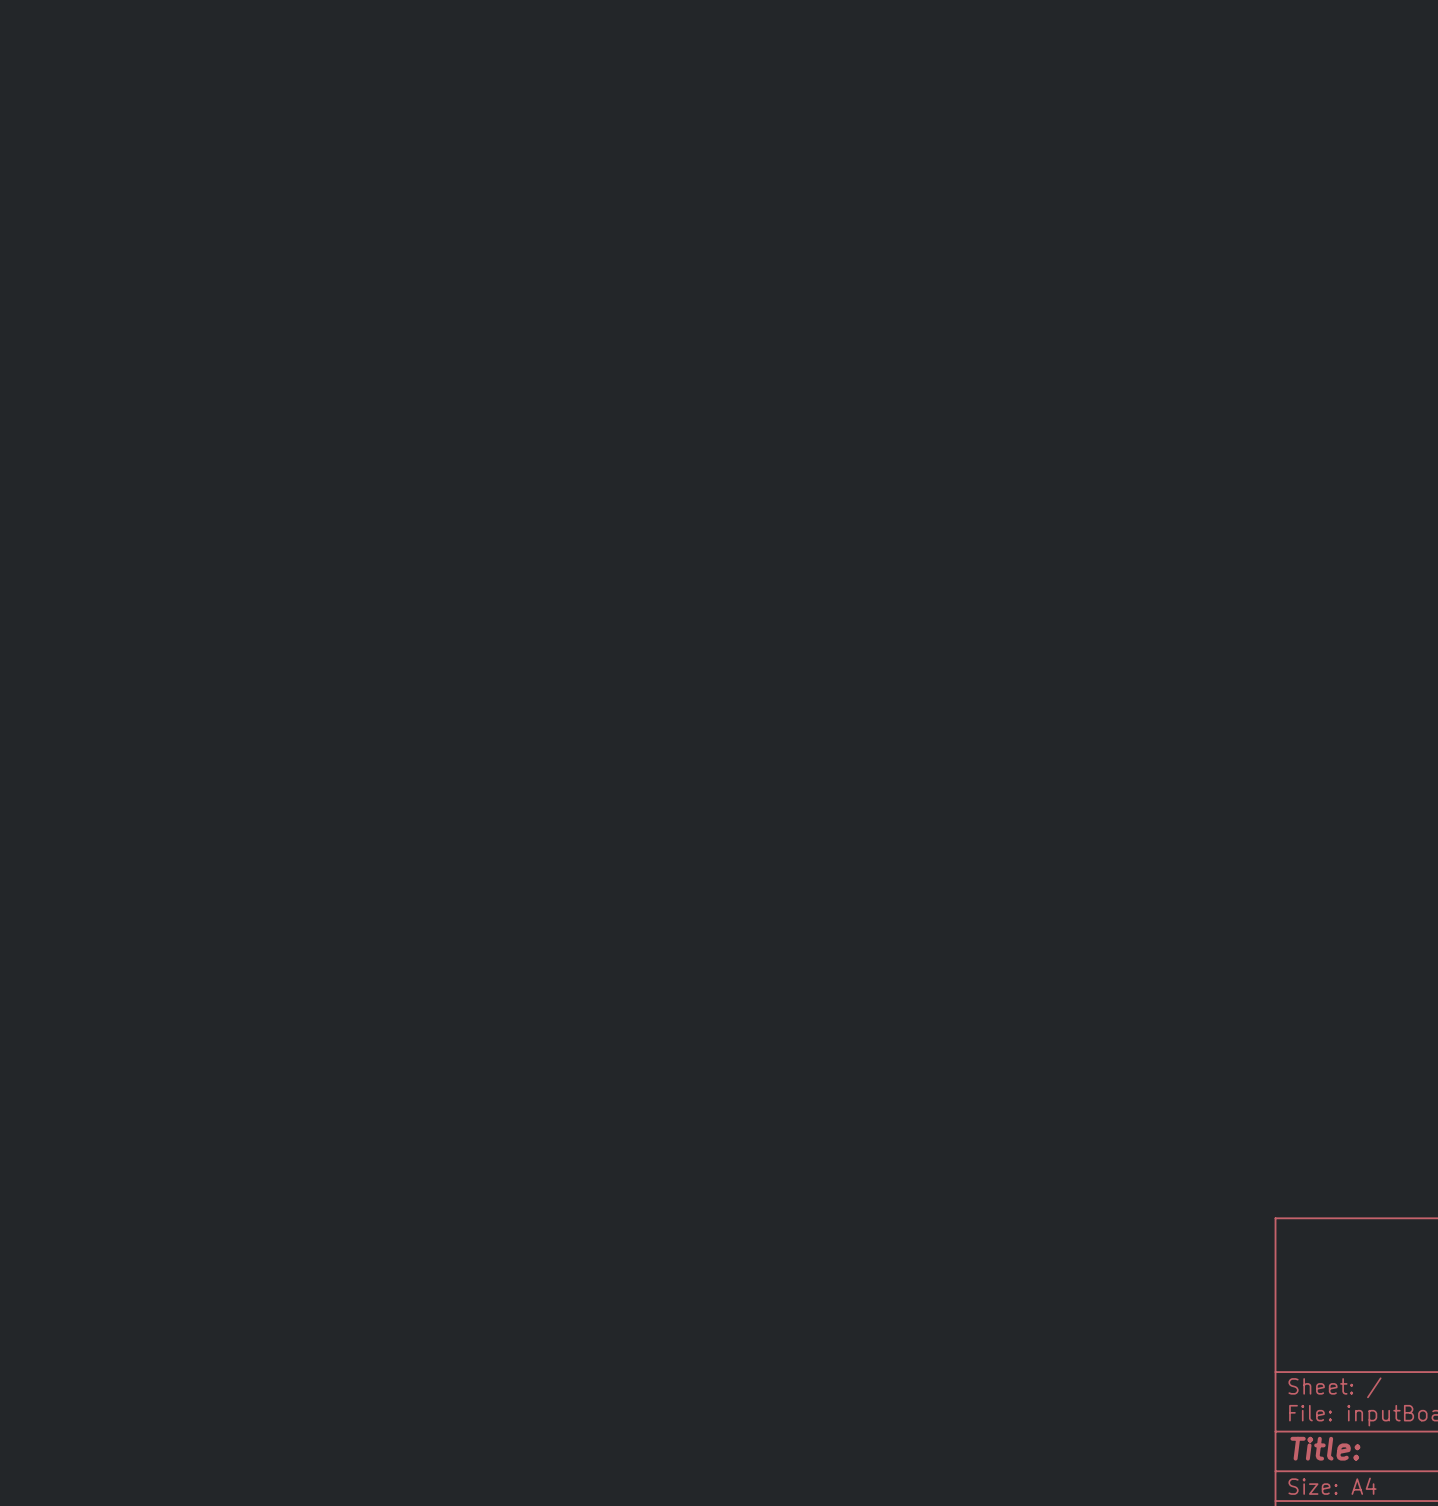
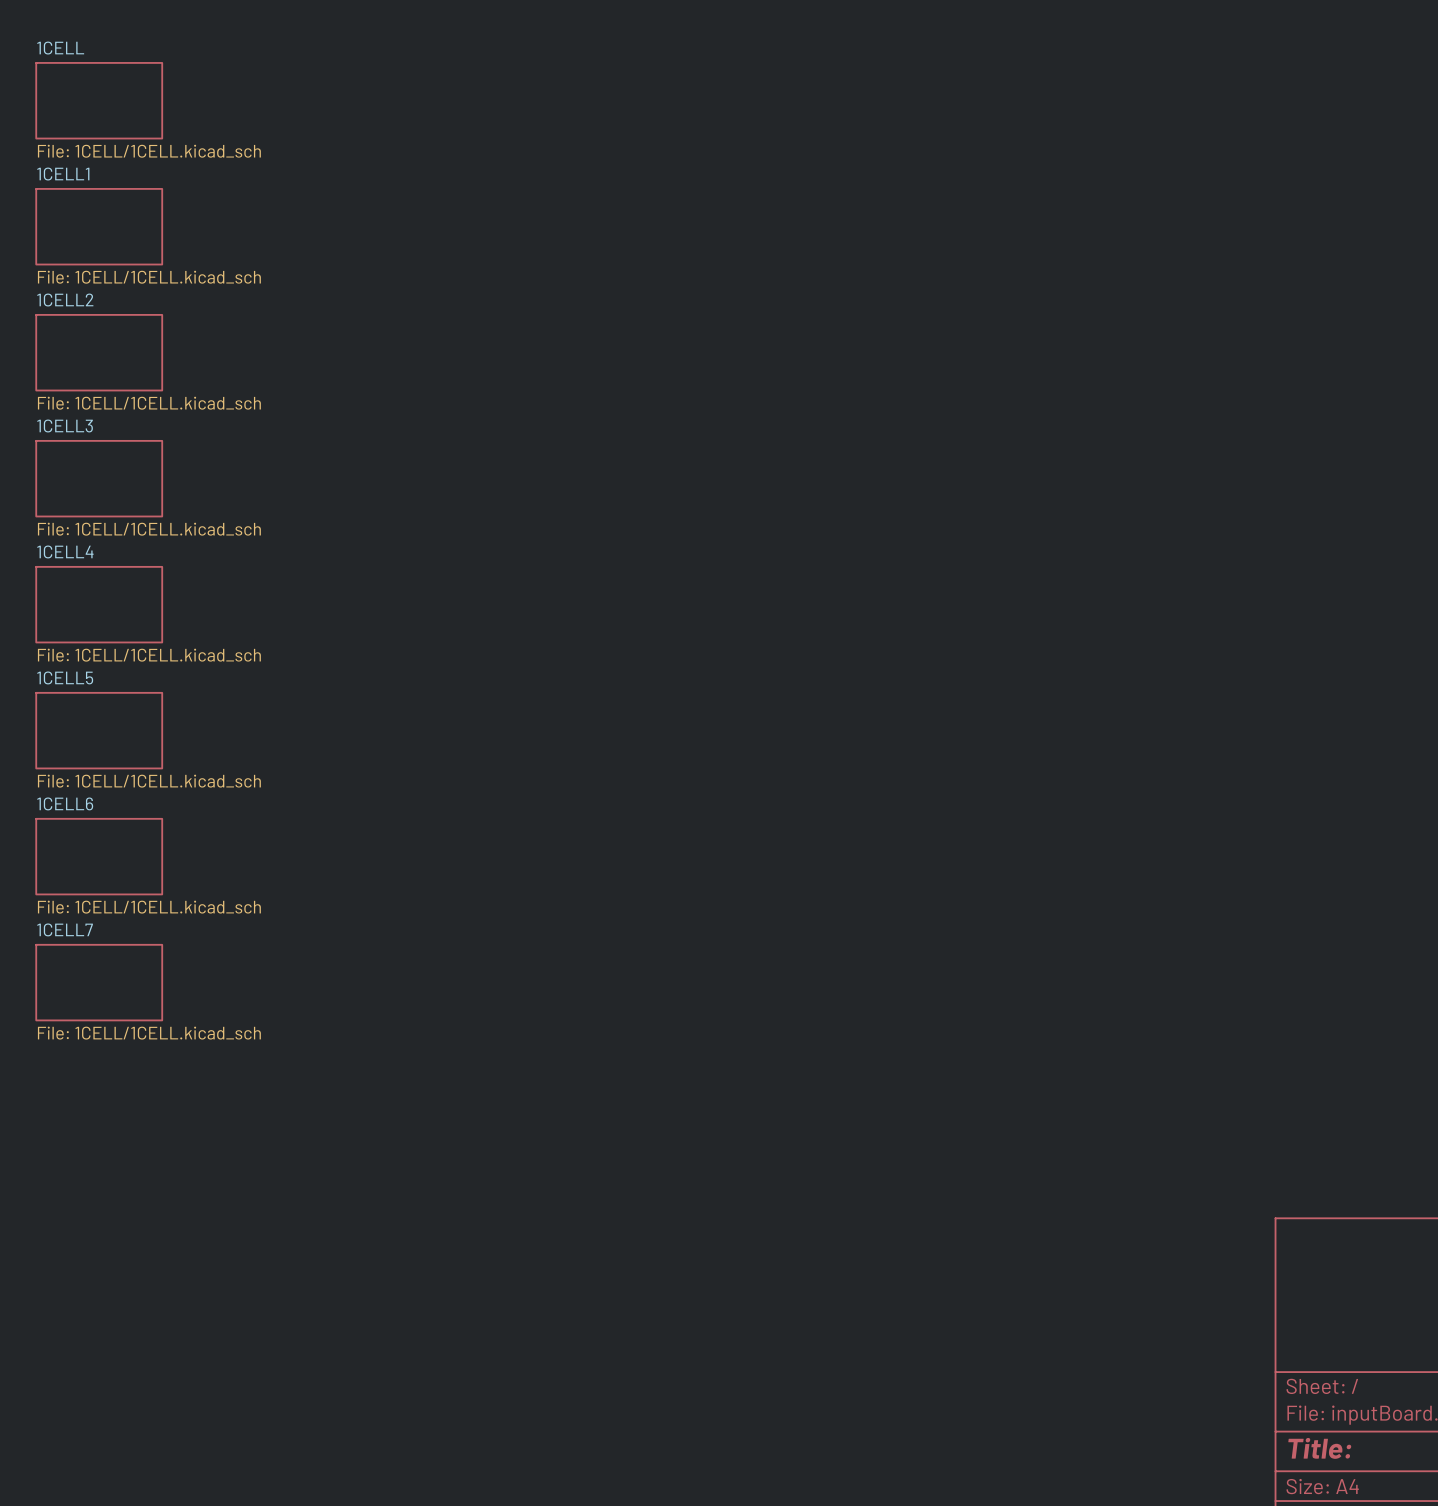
sheet 1CELL: none -> File: 1CELL/1CELL.kicad_sch (99, 100)
sheet 1CELL1: none -> File: 1CELL/1CELL.kicad_sch (99, 226)
sheet 1CELL2: none -> File: 1CELL/1CELL.kicad_sch (99, 352)
sheet 1CELL3: none -> File: 1CELL/1CELL.kicad_sch (99, 478)
sheet 1CELL4: none -> File: 1CELL/1CELL.kicad_sch (99, 604)
sheet 1CELL5: none -> File: 1CELL/1CELL.kicad_sch (99, 730)
sheet 1CELL6: none -> File: 1CELL/1CELL.kicad_sch (99, 856)
sheet 1CELL7: none -> File: 1CELL/1CELL.kicad_sch (99, 982)

